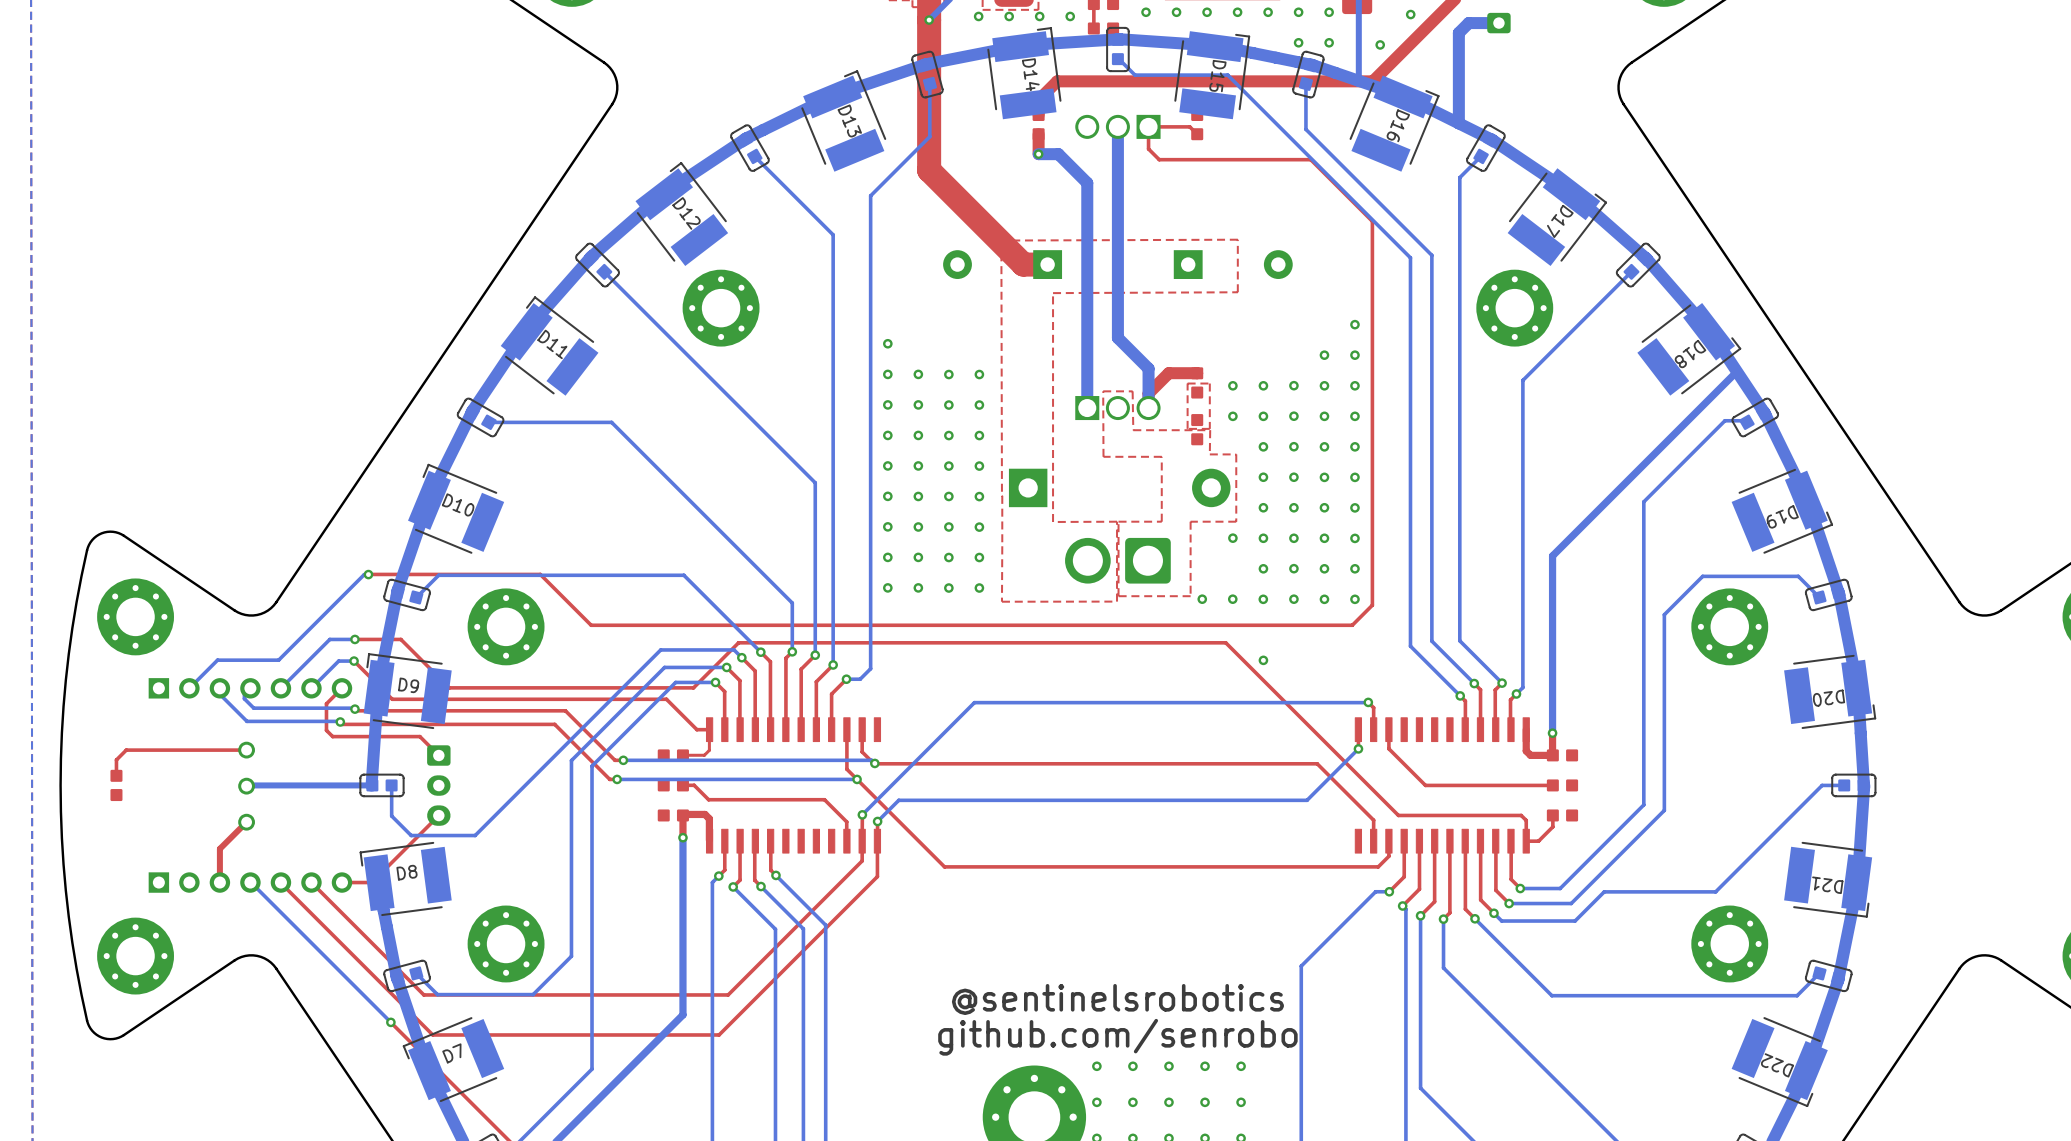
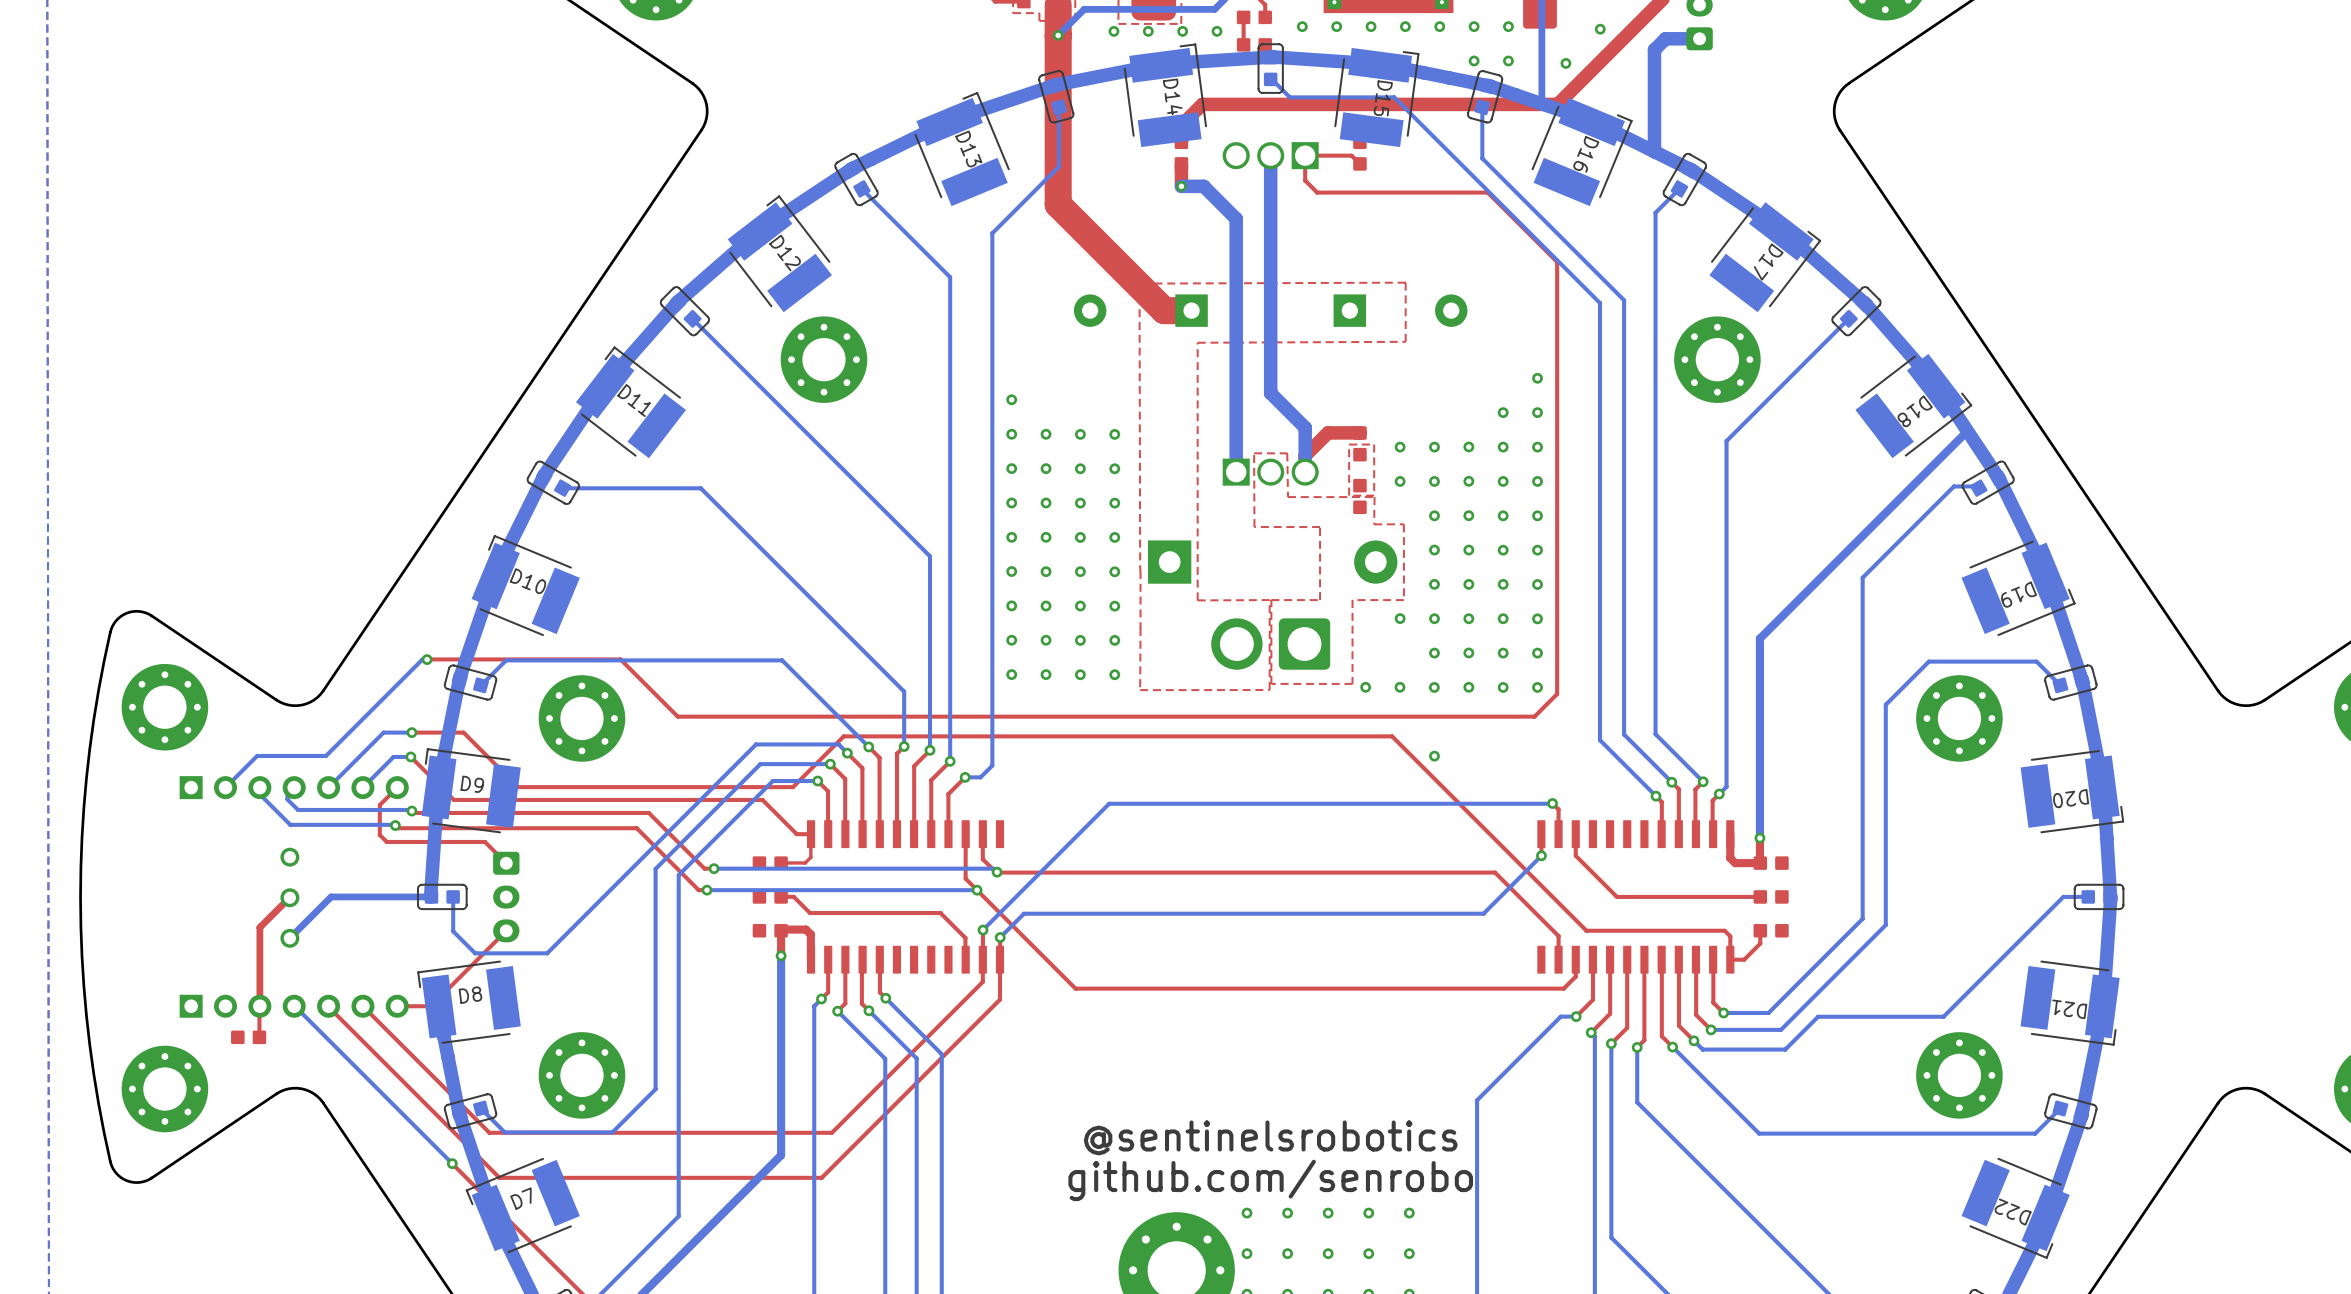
top track: (246, 750) (126, 750) (116, 759) (116, 775) -> none
part rotation: 0° (116, 785) -> 90° clockwise (248, 1037)
part position: (116, 785) -> (248, 1037)
bottom track: (283, 785) (246, 785) -> (331, 896) (290, 937)
top track: (246, 822) (219, 848) -> (290, 897) (259, 927) (259, 968)
top track: none -> (259, 1006) (259, 1037)

